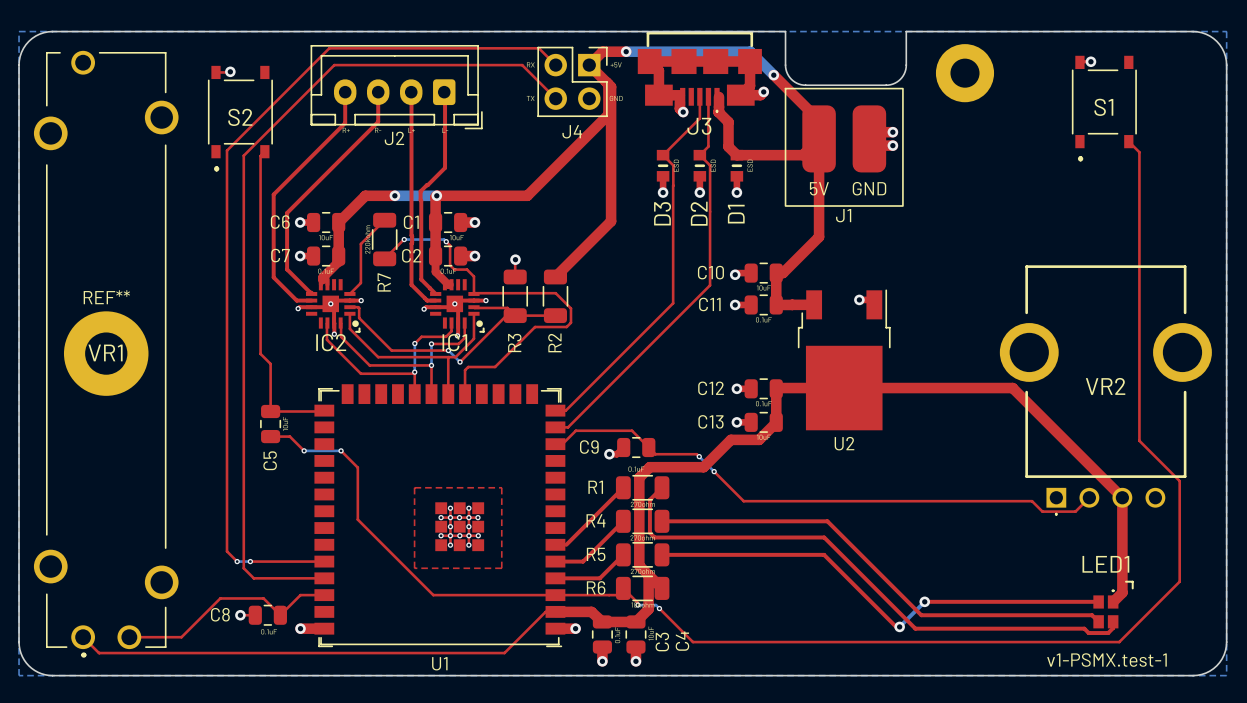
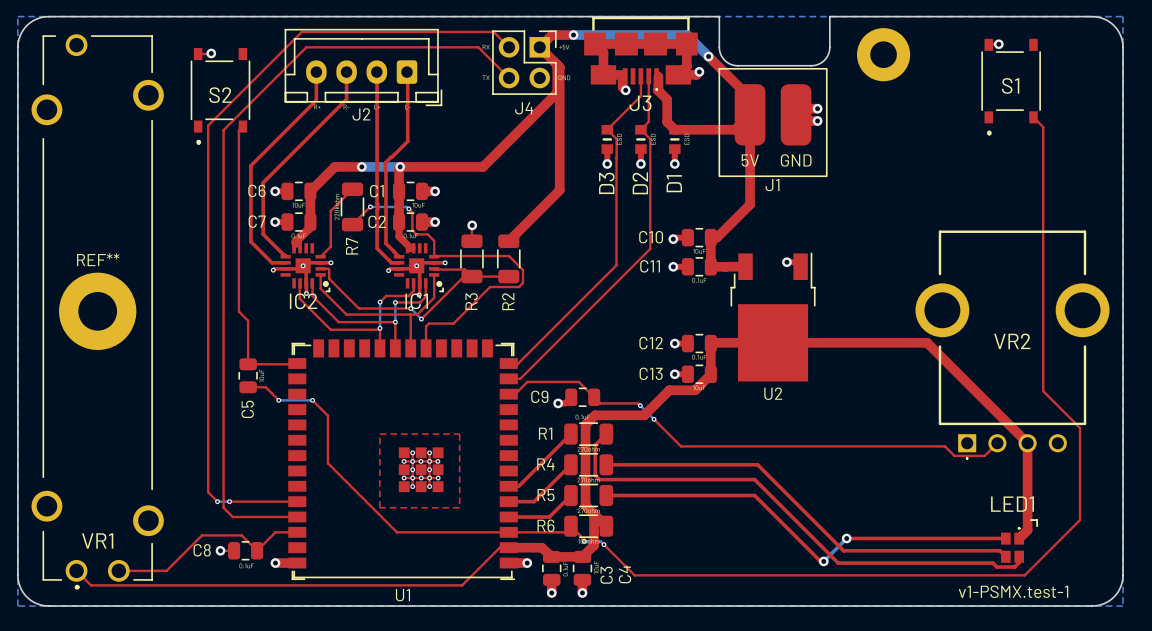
VR1 name position: VR1 (105, 352) -> VR1 (97, 540)

